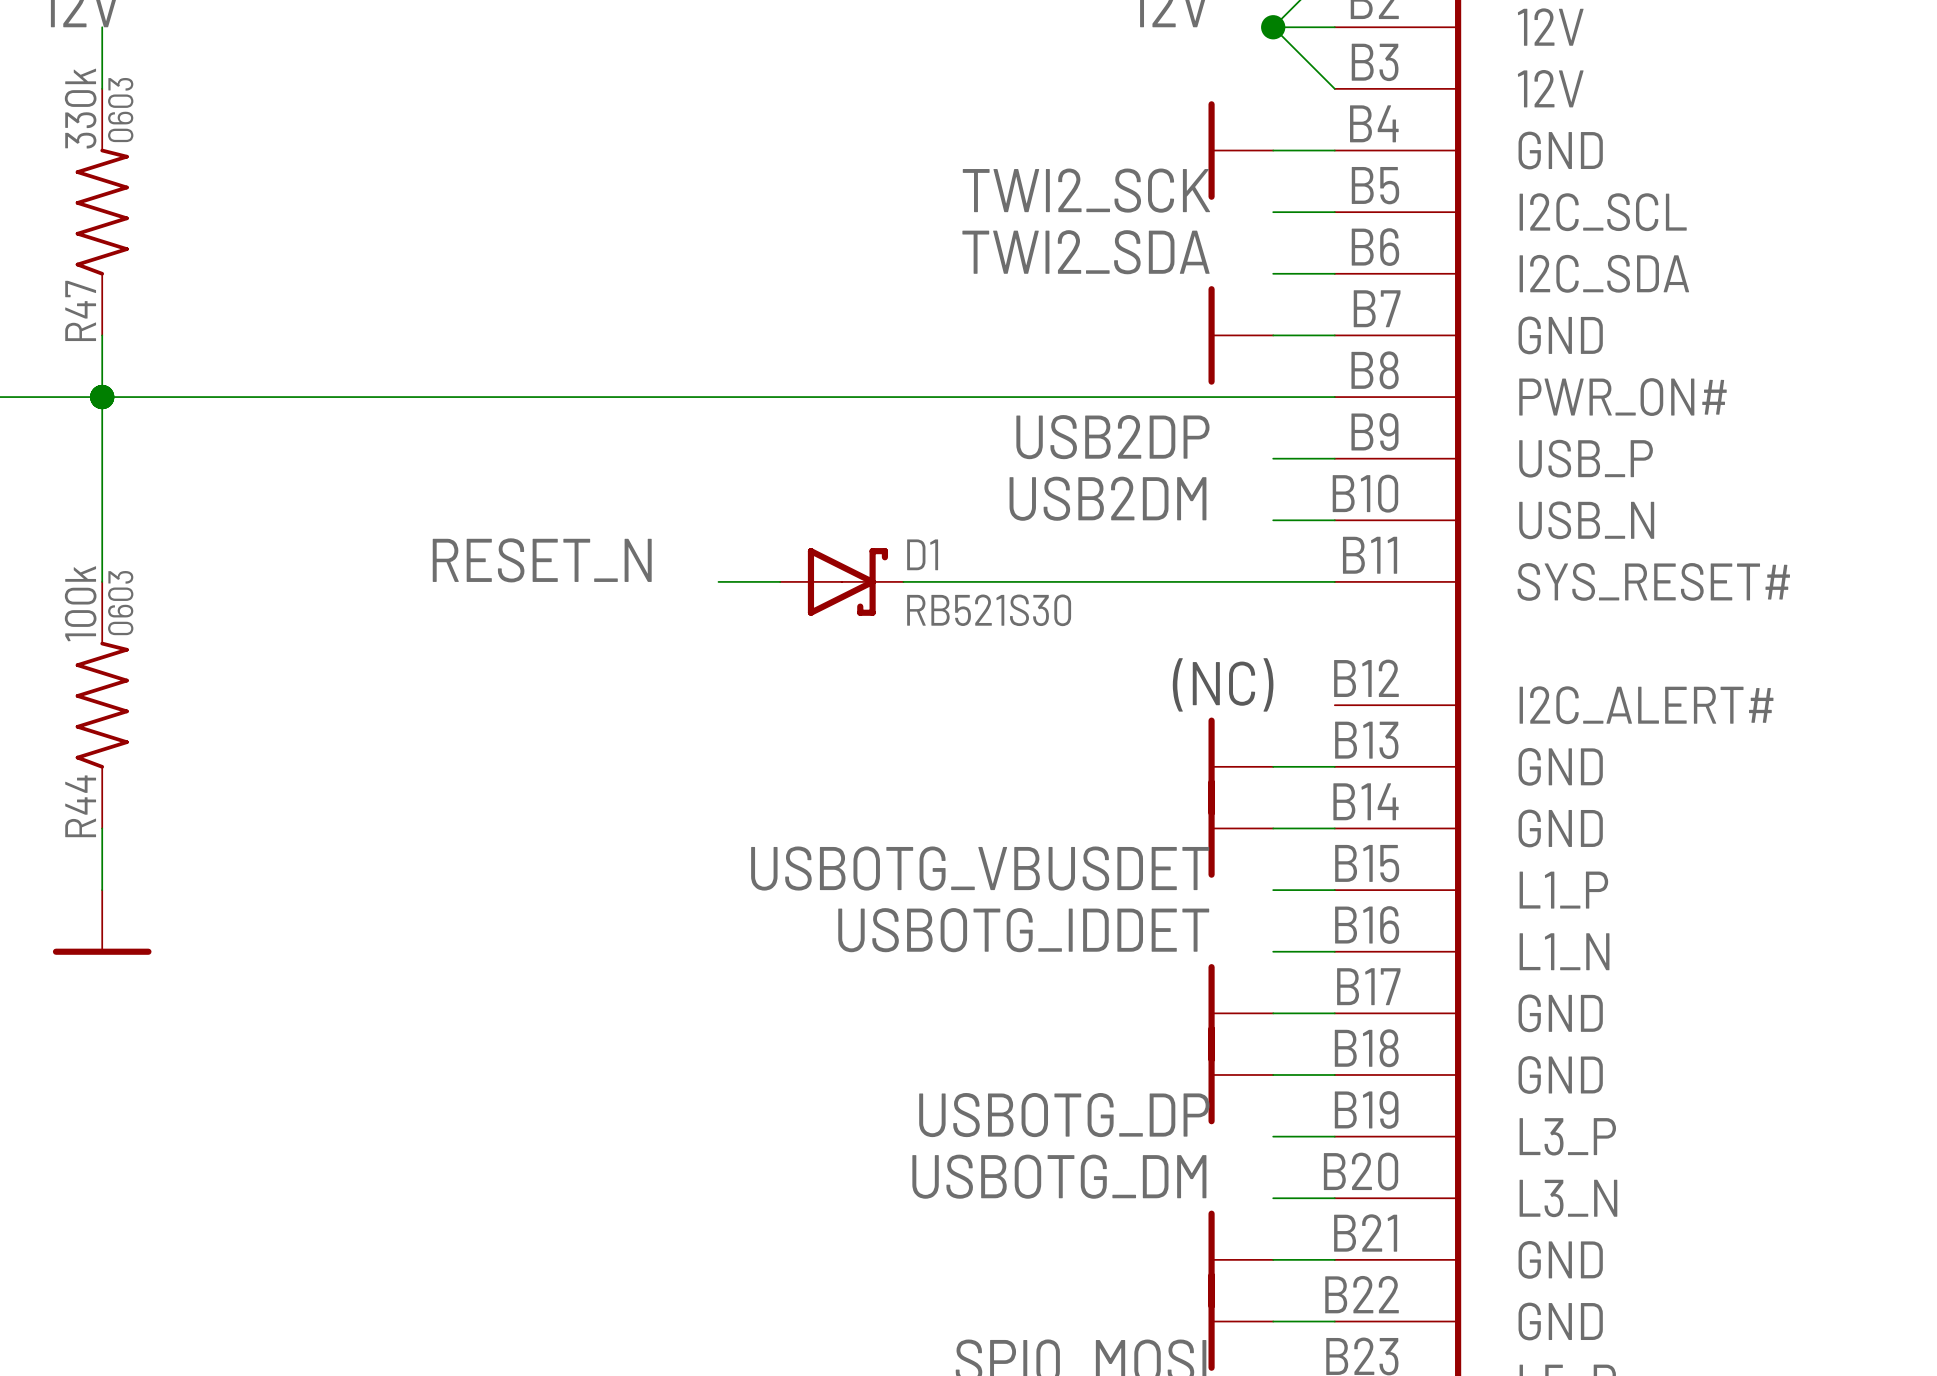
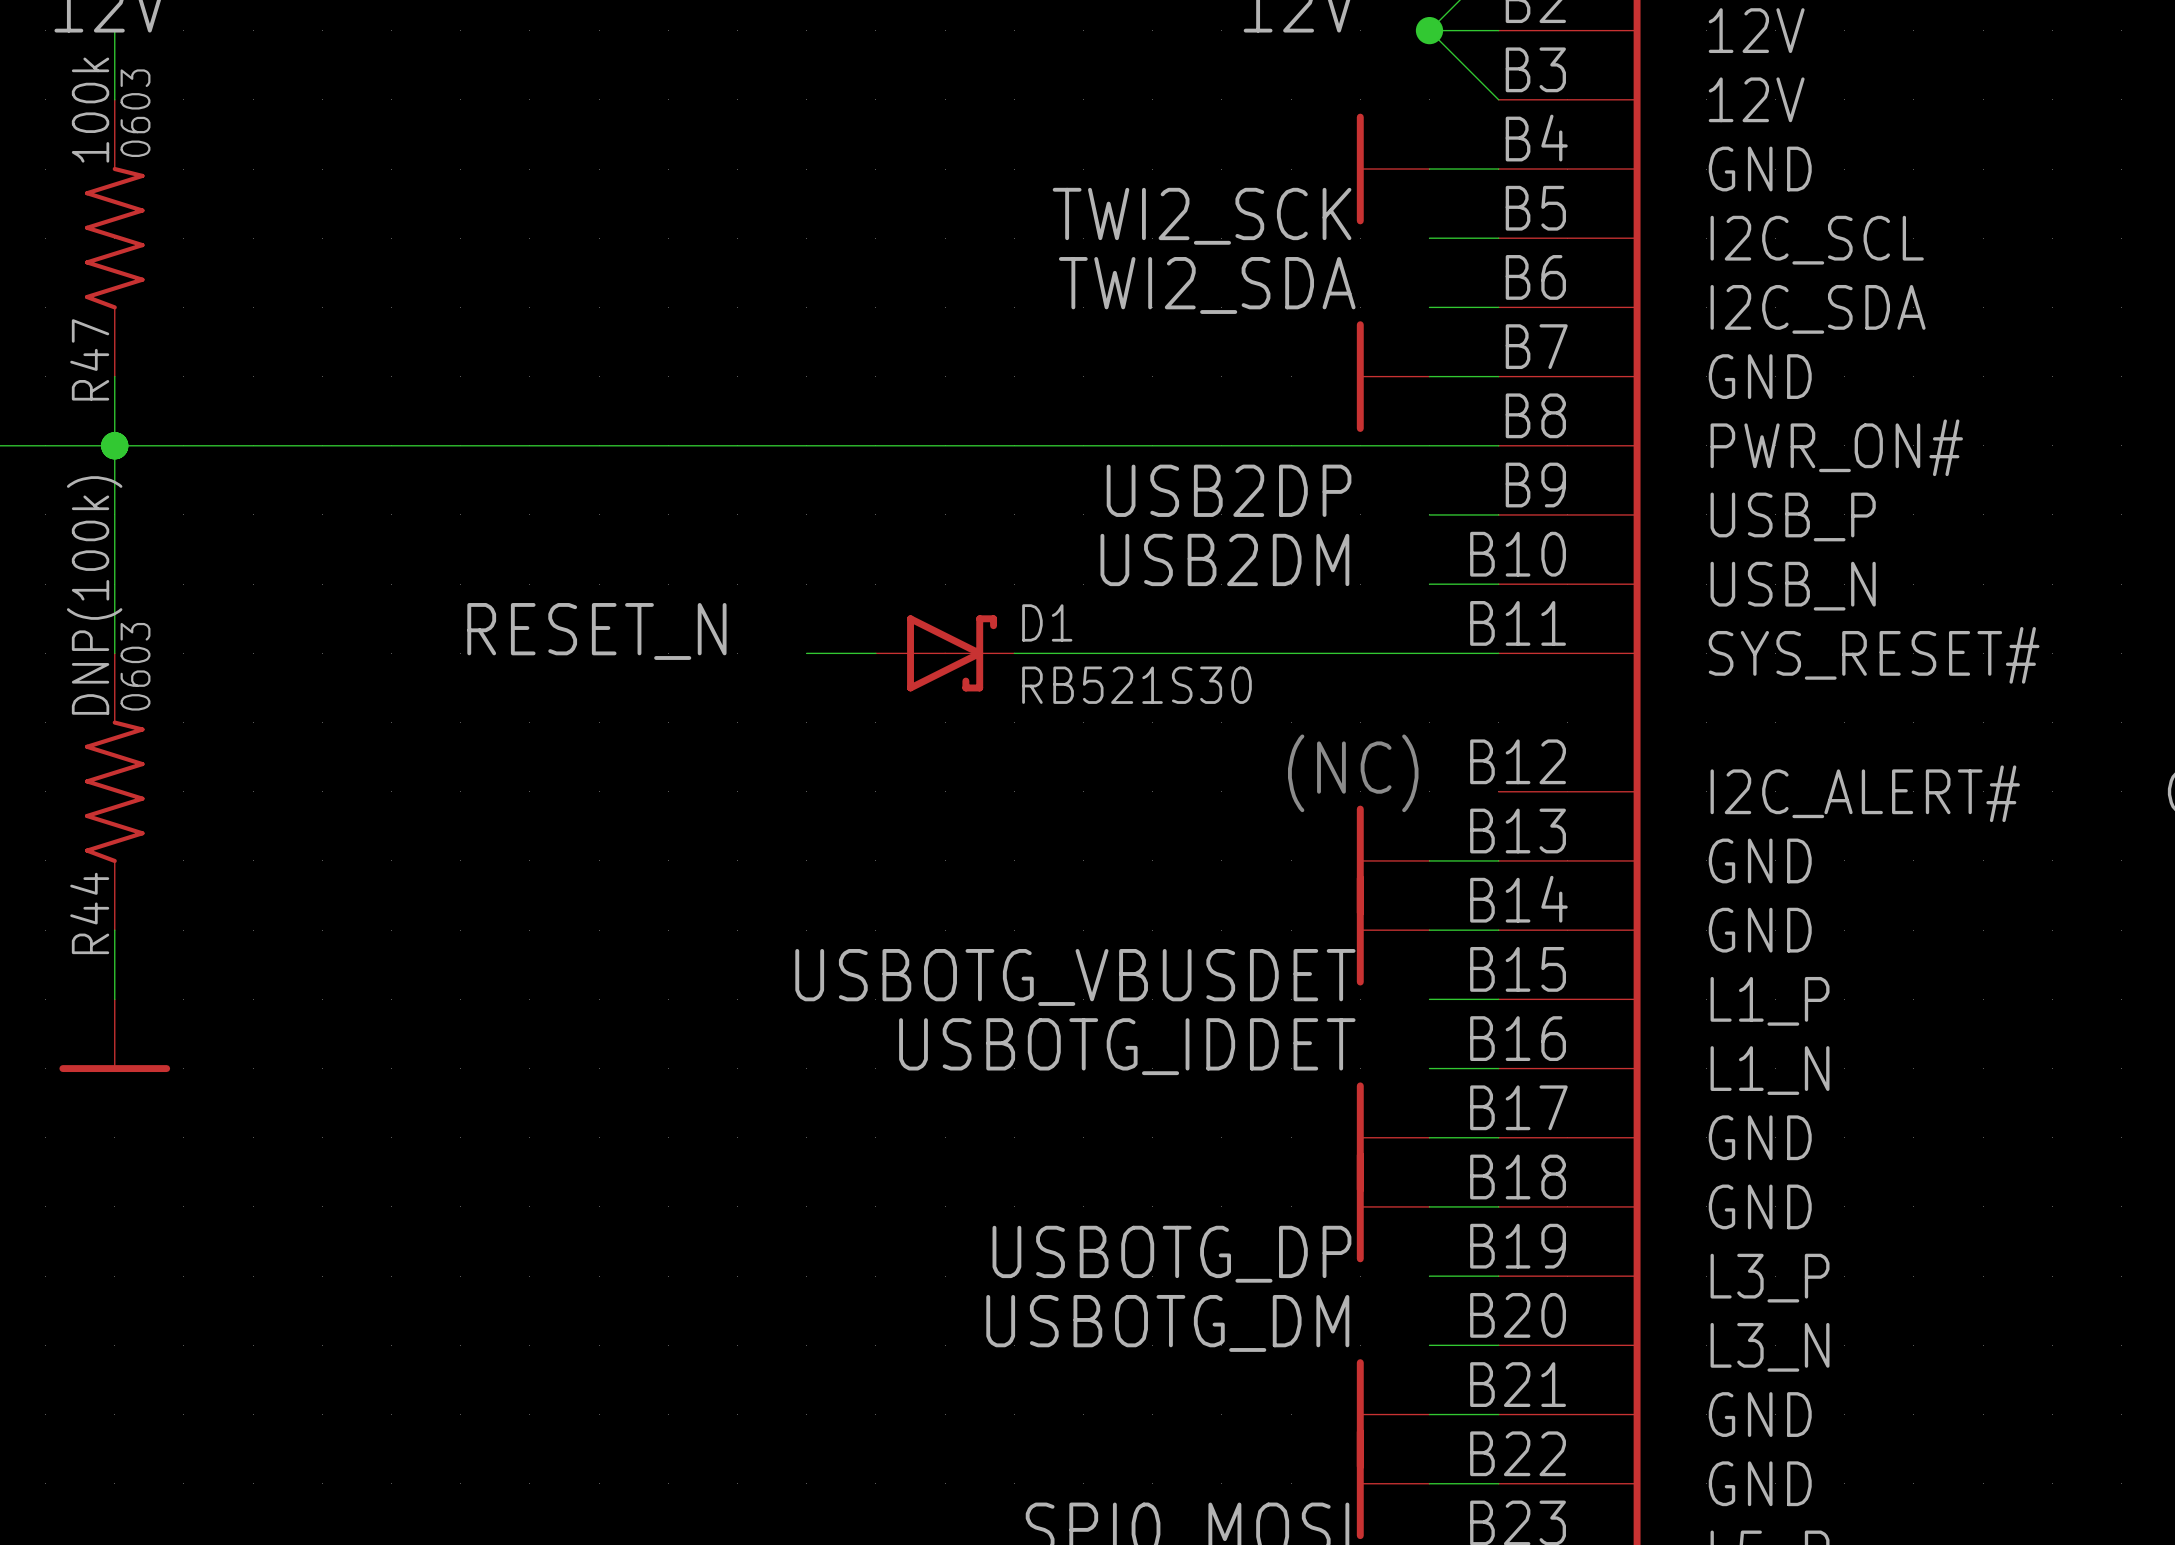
R47 value: 330k (80, 108) -> 100k (90, 110)
R44 value: 100k (80, 603) -> DNP(100k) (94, 595)

